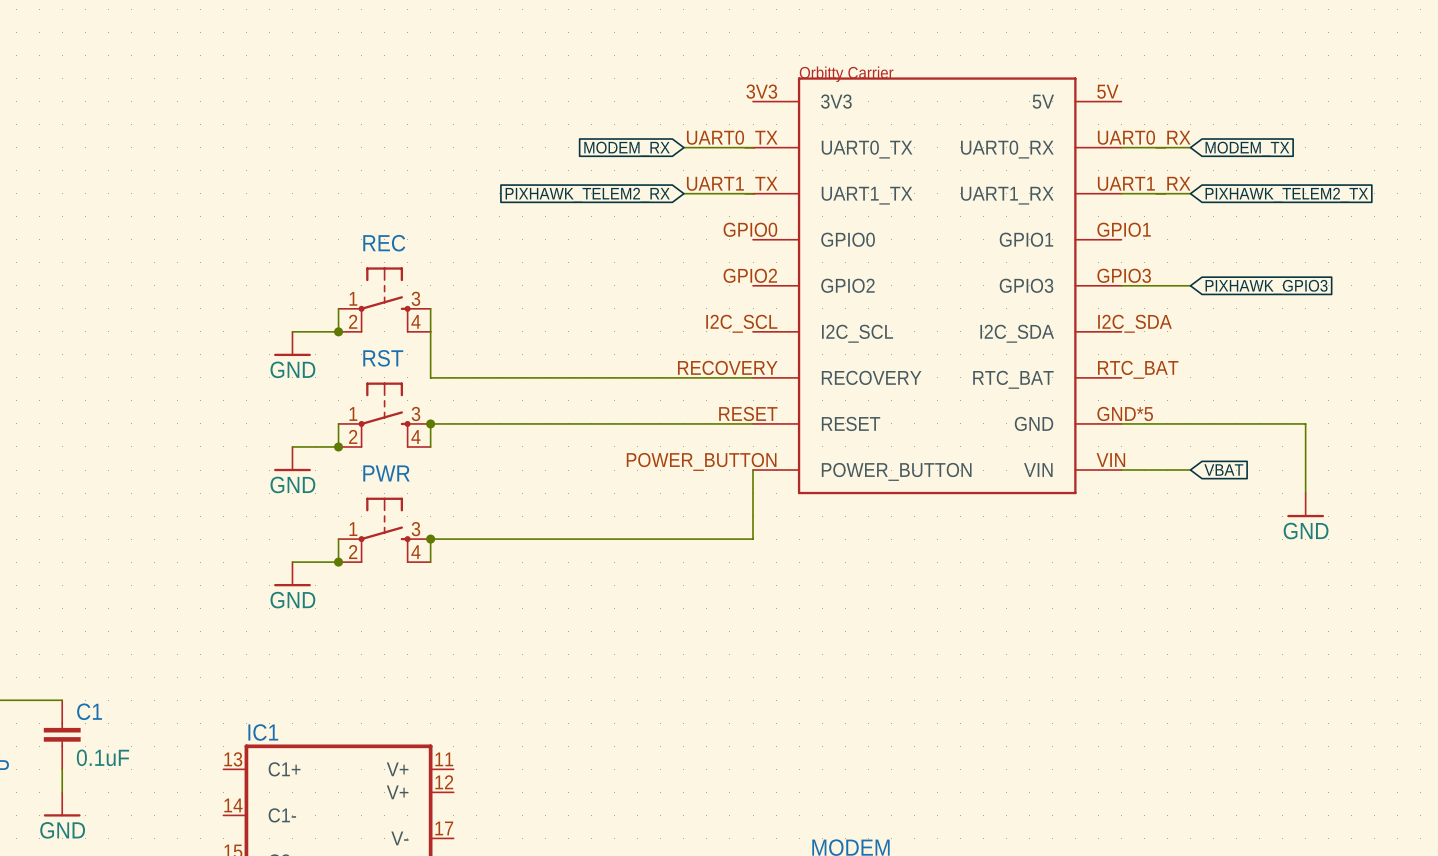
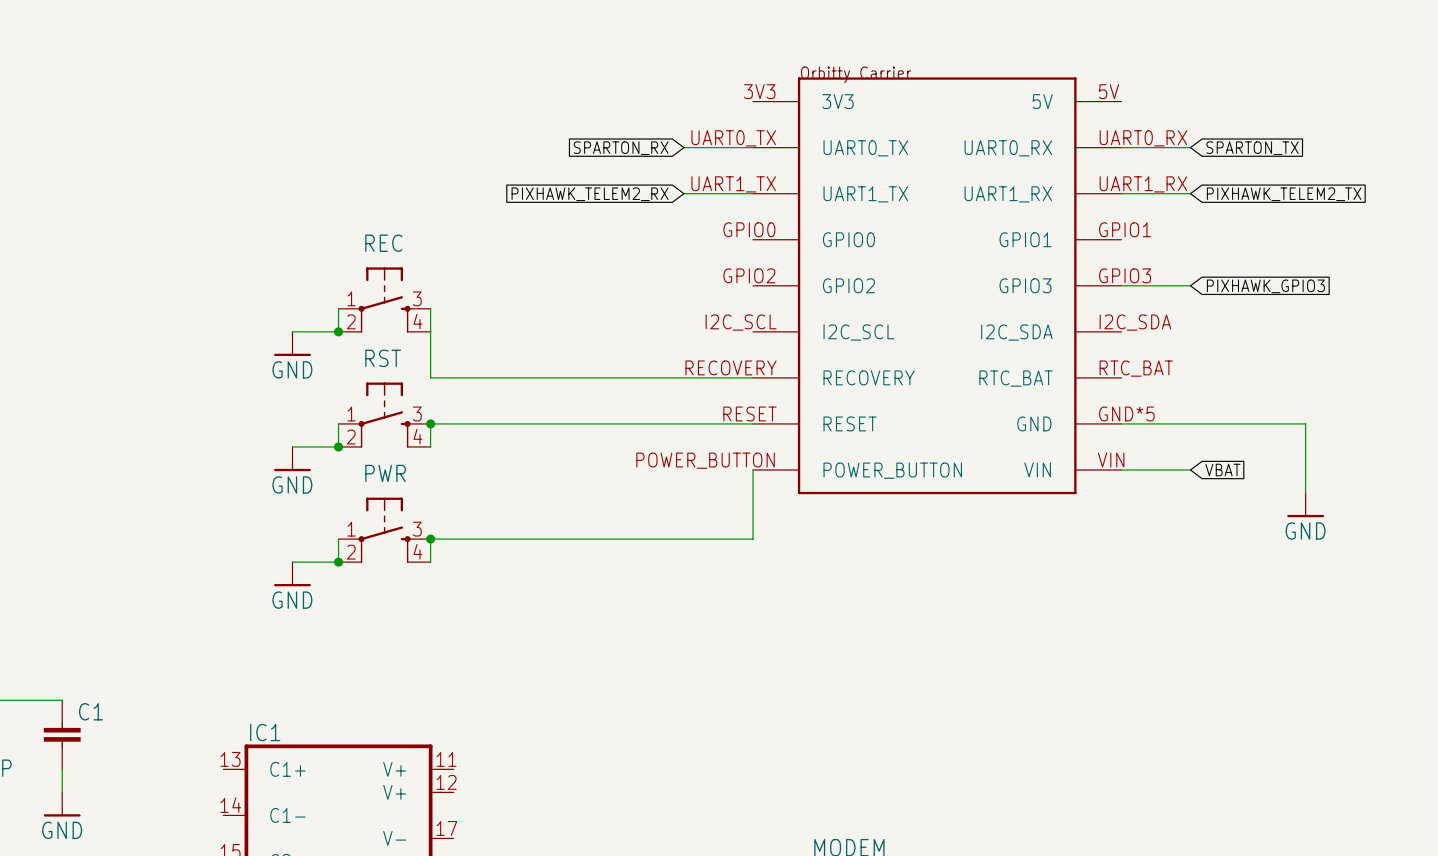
global label: MODEM_RX (627, 149) -> SPARTON_RX (621, 148)
global label: MODEM_TX (1247, 149) -> SPARTON_TX (1252, 148)
C1 value: 0.1uF (102, 757) -> none

